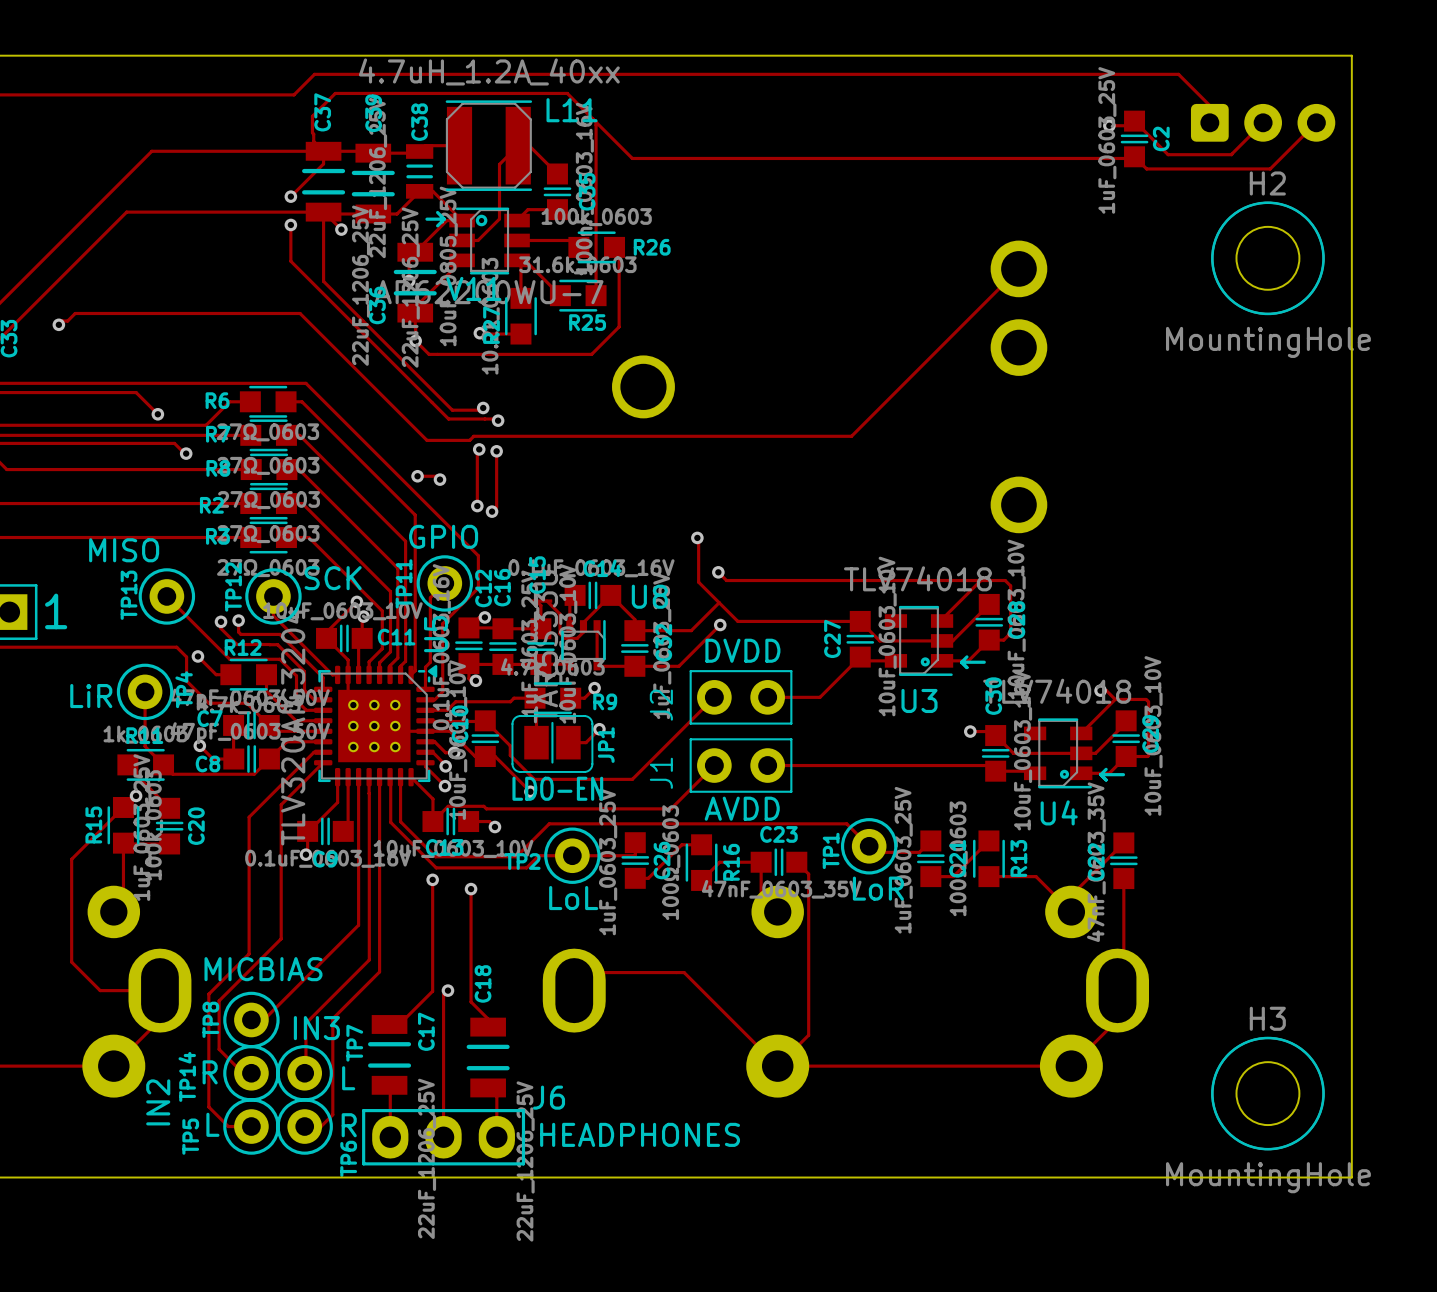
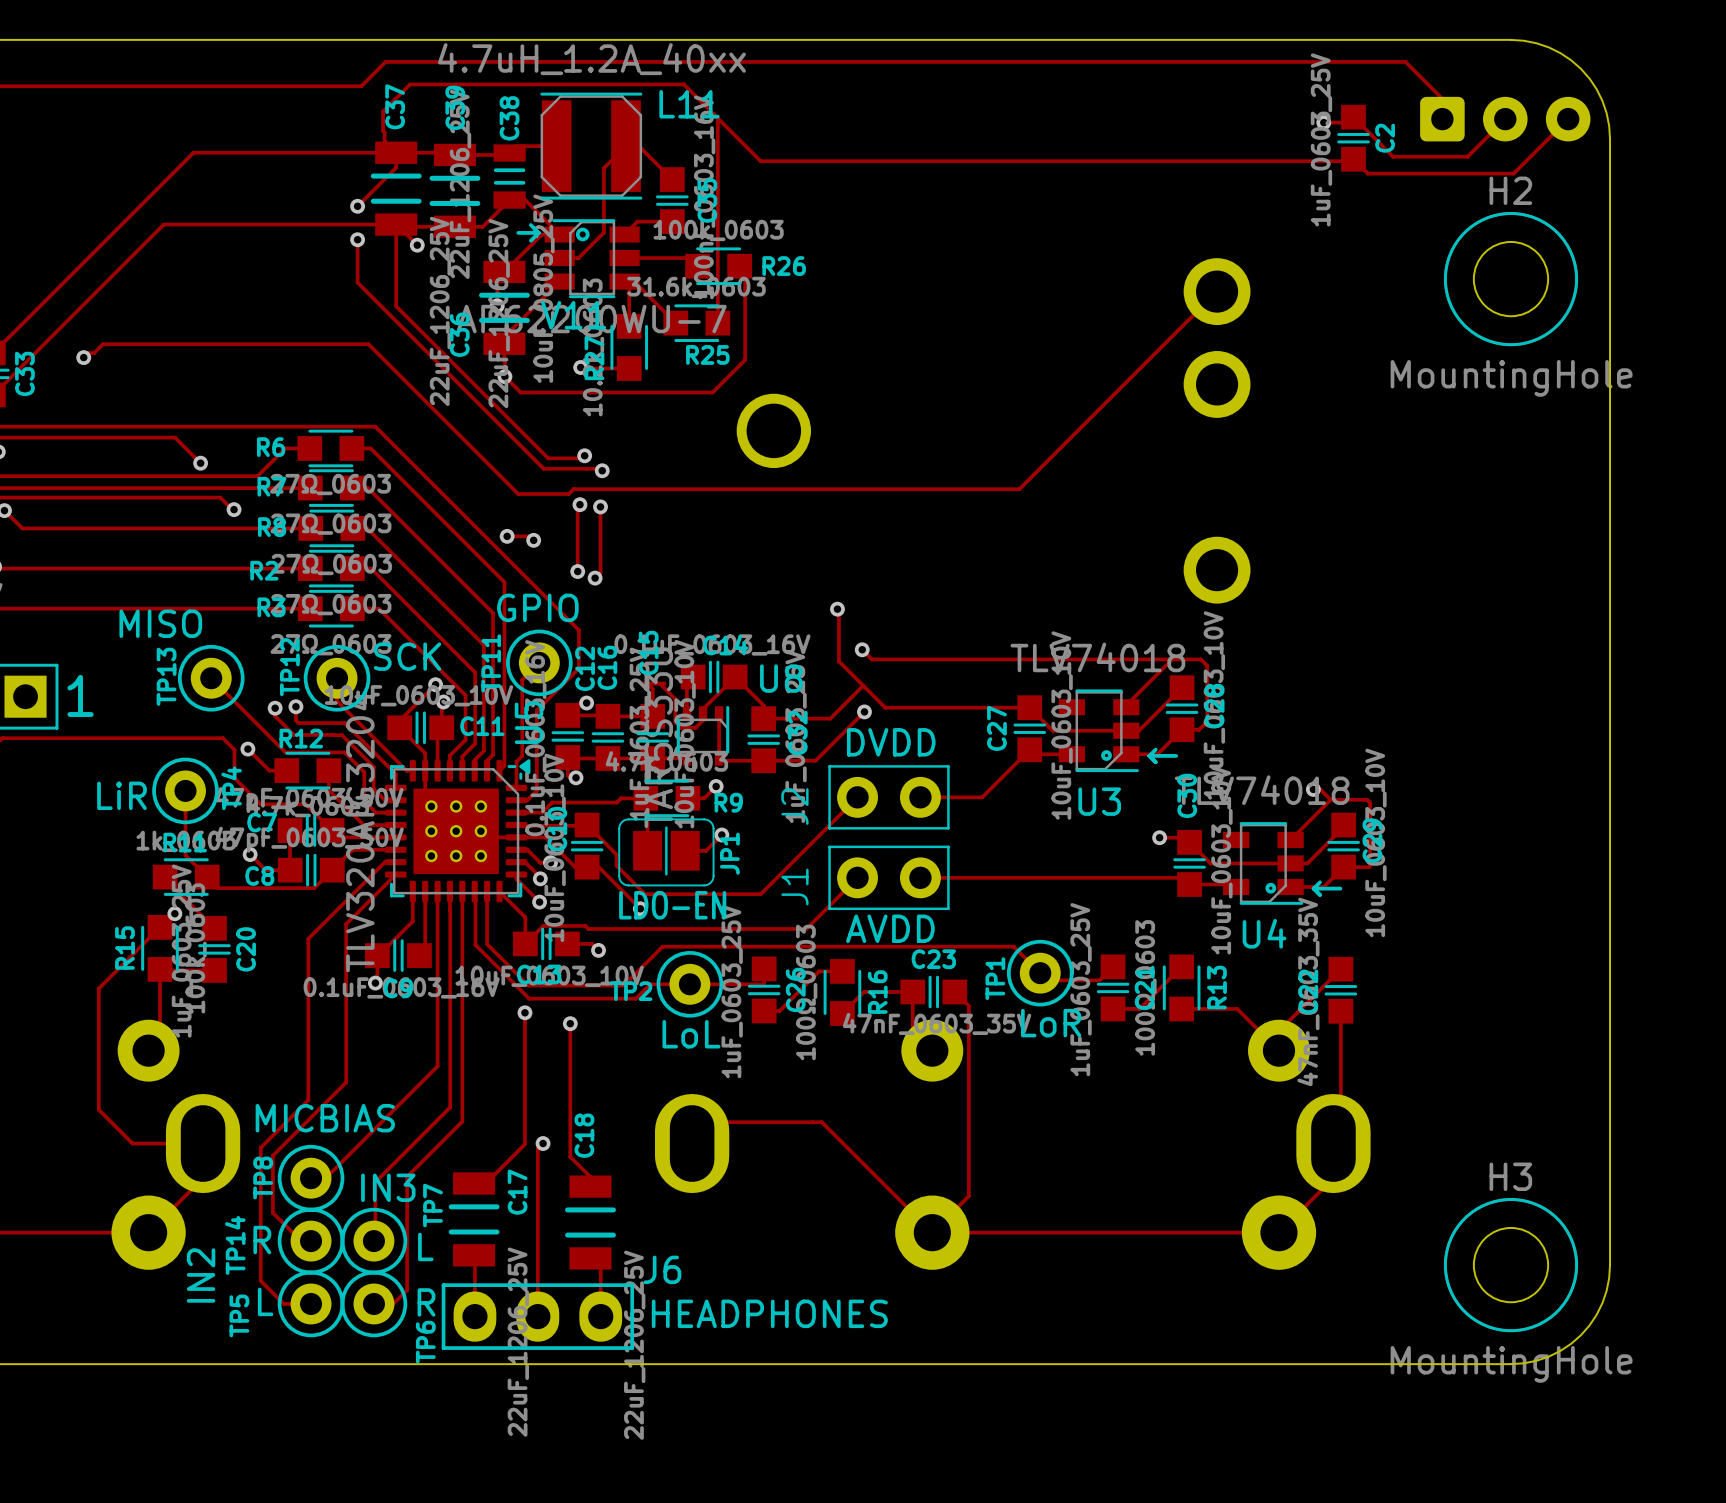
board edge: (1267, 55) (1351, 55) (1351, 139) -> (1510, 39) (1523, 40) (1548, 47) (1560, 53) (1581, 68) (1589, 78) (1602, 101) (1606, 113) (1610, 138)
board edge: (1351, 1093) (1351, 1177) (1267, 1177) -> (1610, 1265) (1609, 1278) (1602, 1303) (1596, 1314) (1581, 1335) (1571, 1343) (1548, 1356) (1523, 1363) (1510, 1364)

